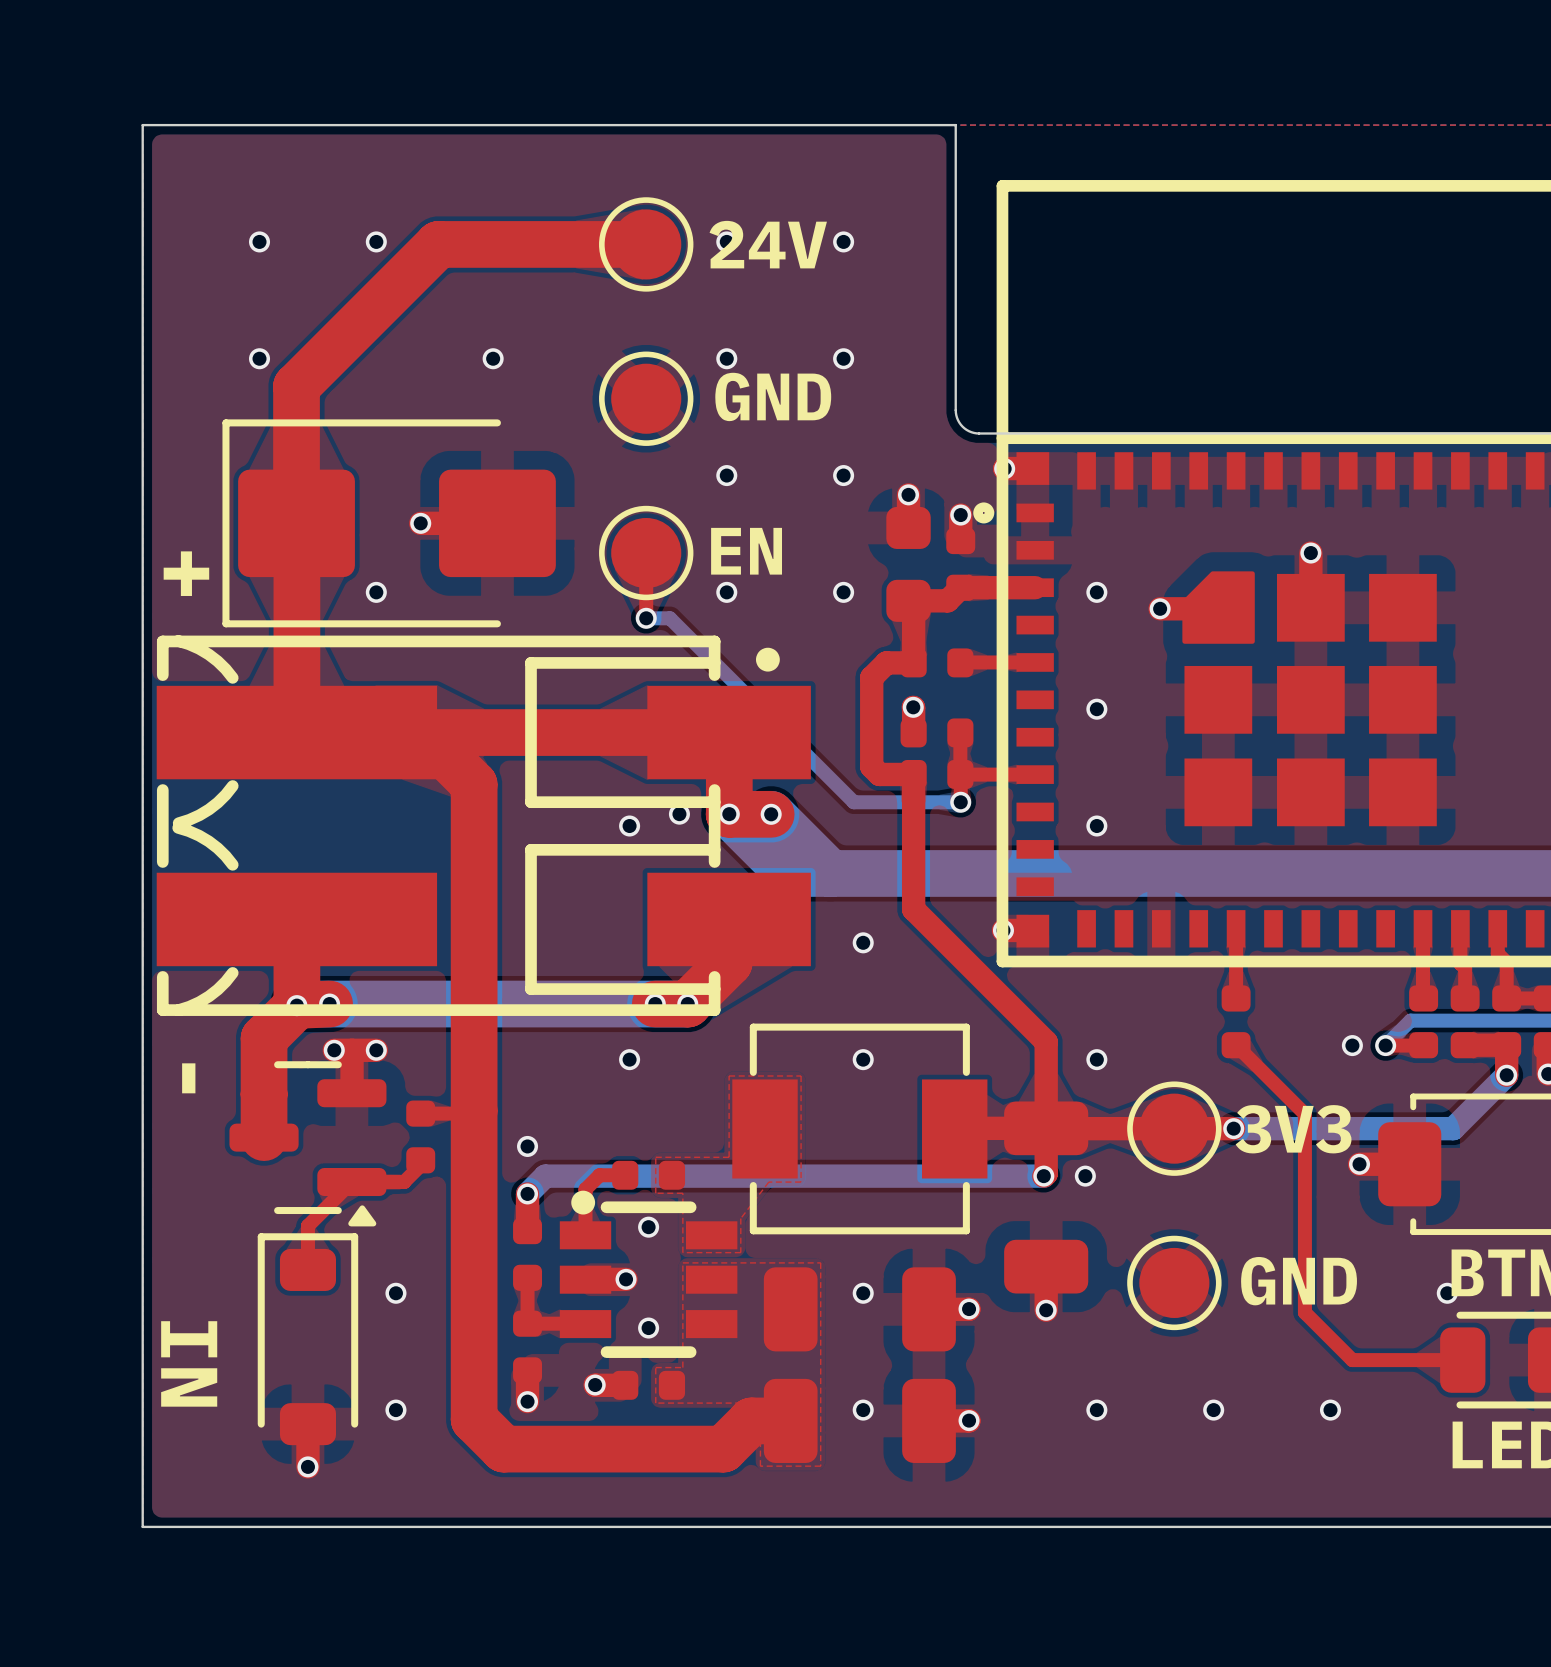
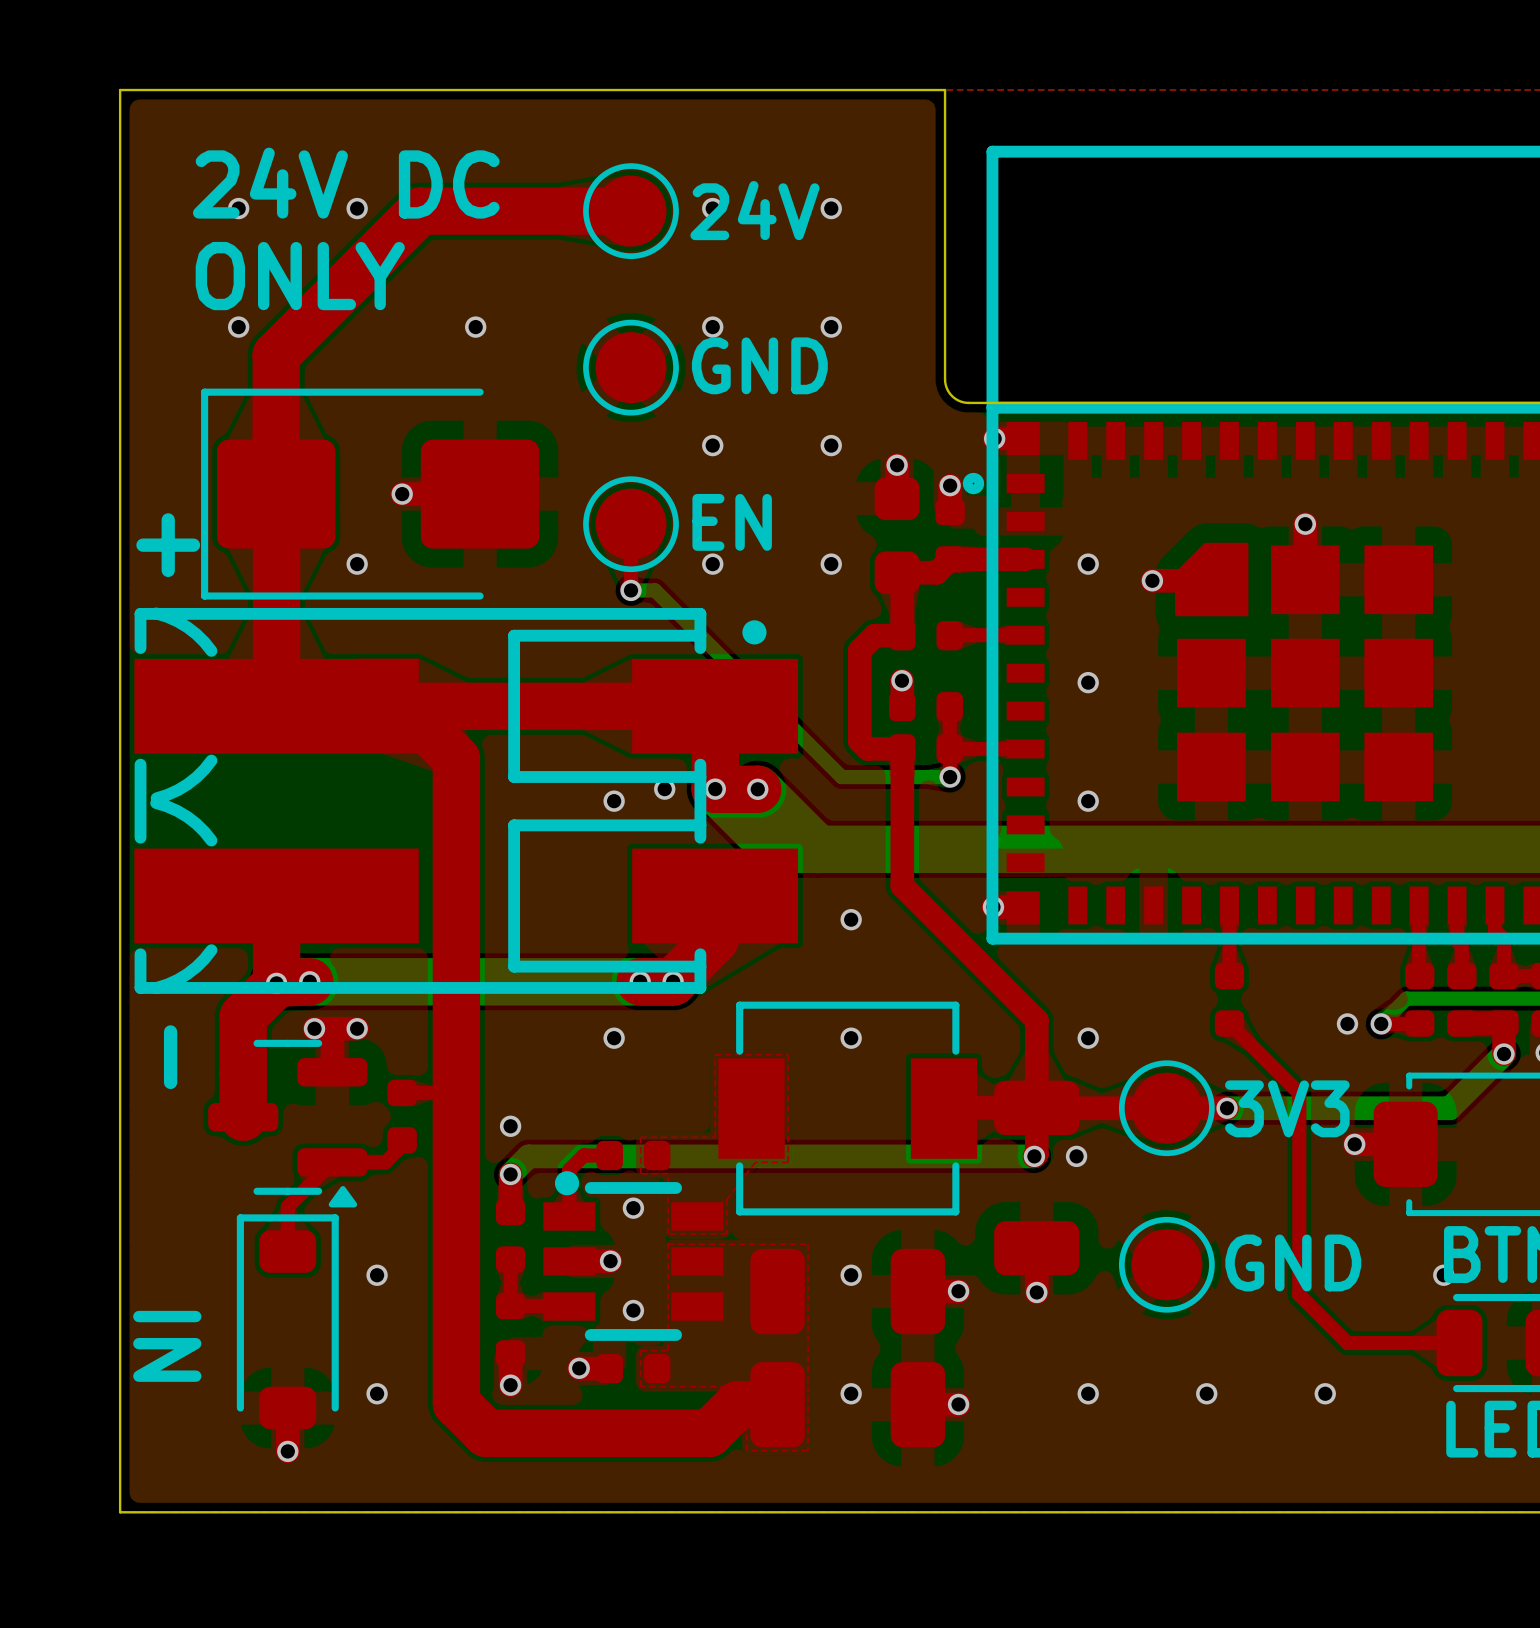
text: none -> 24V DC (346, 183)
text: none -> ONLY (300, 276)

